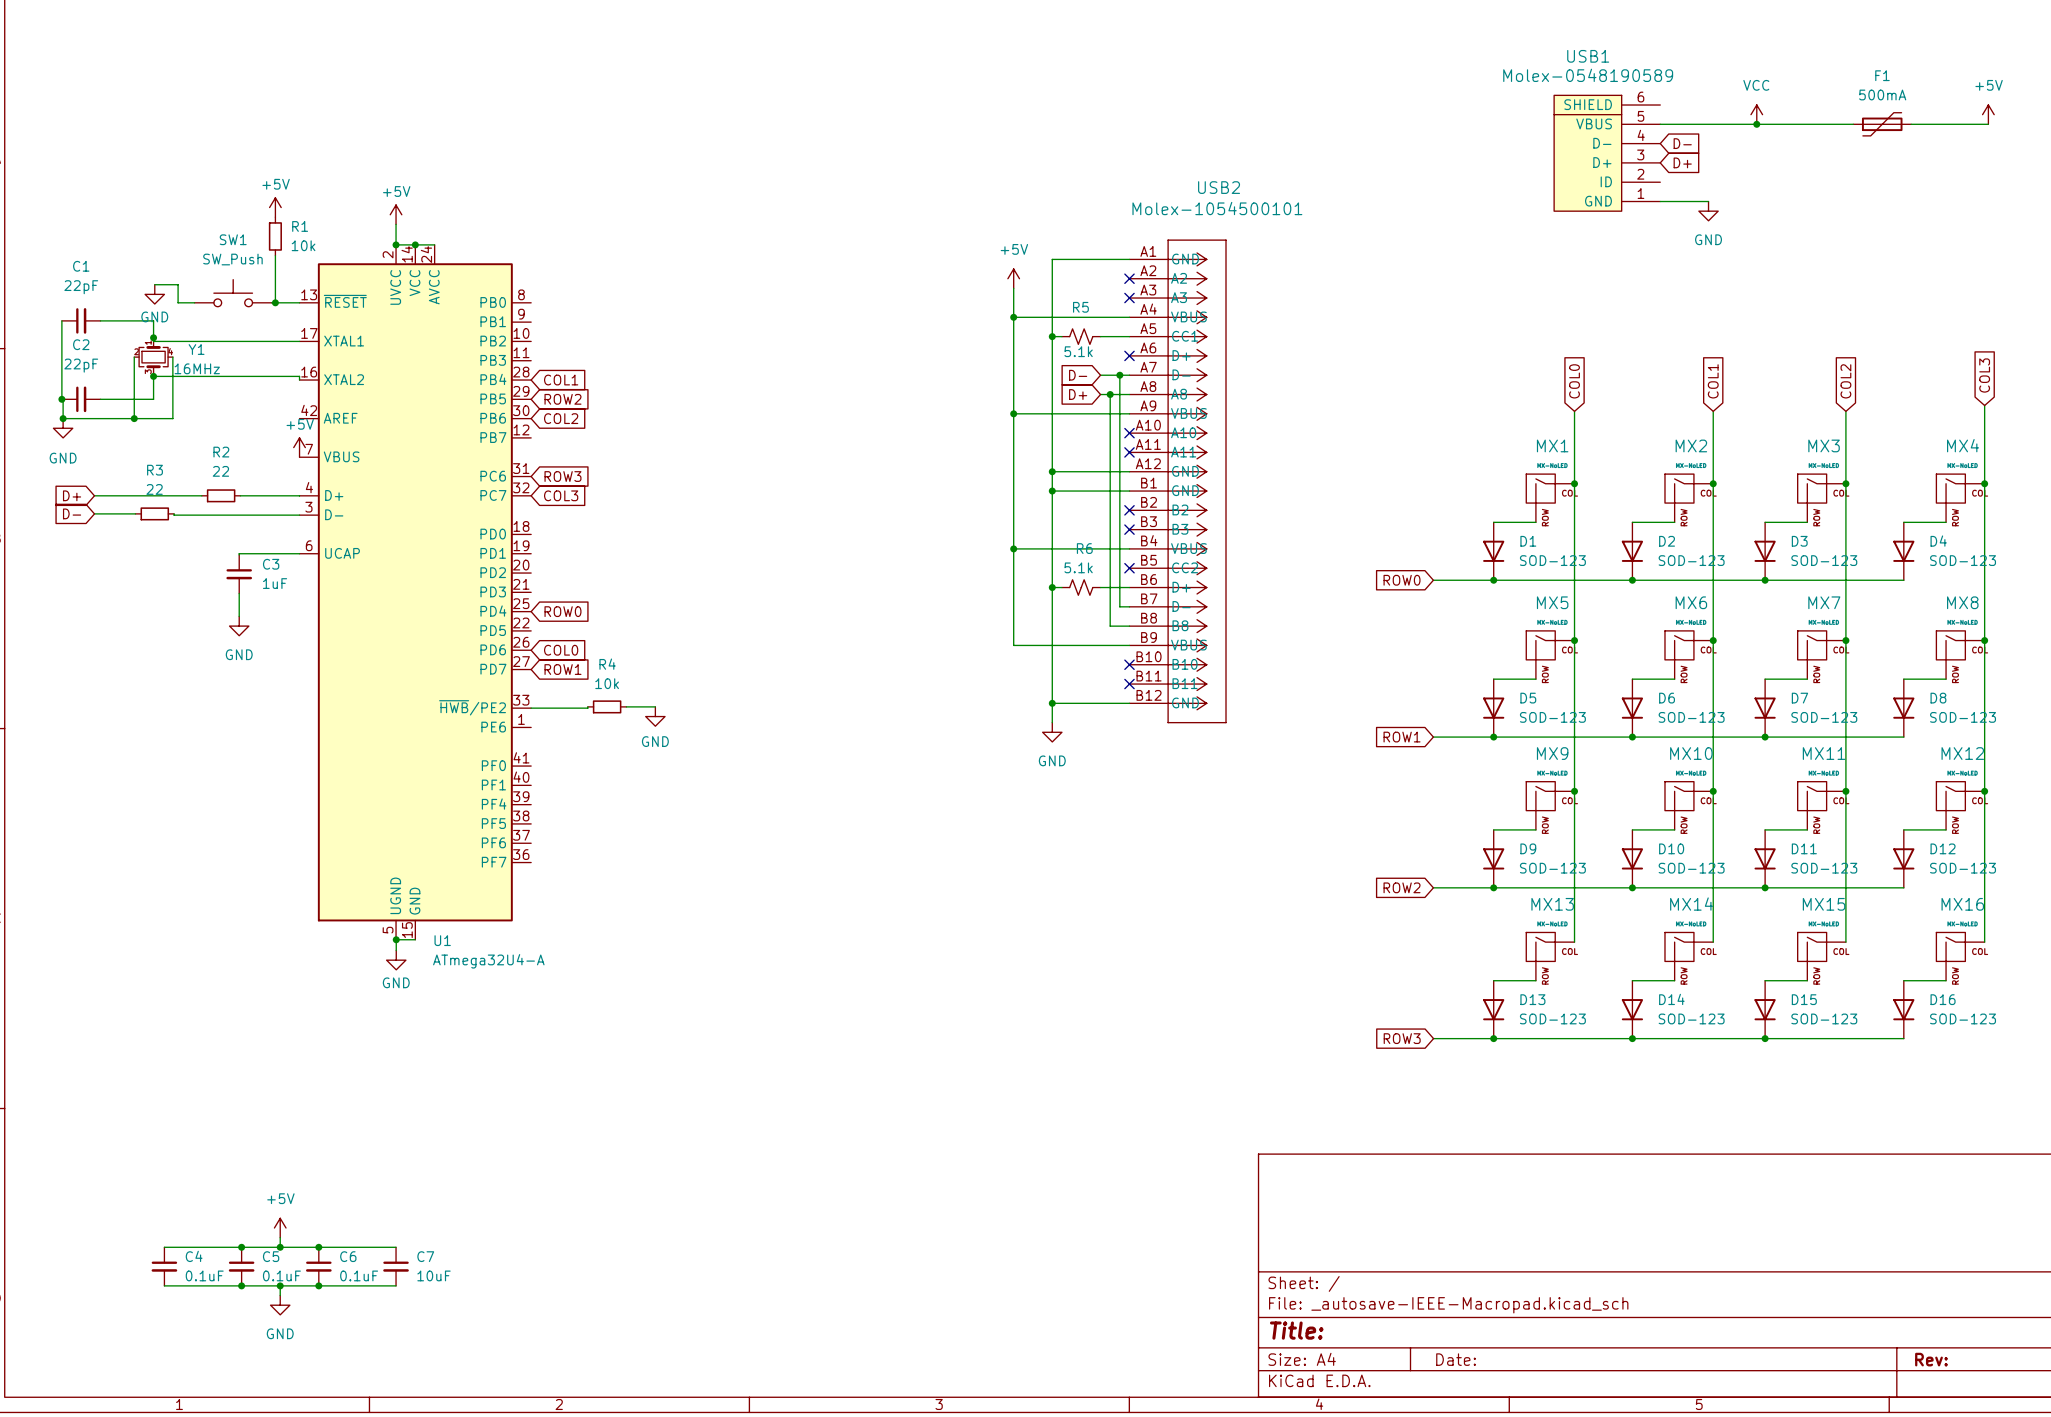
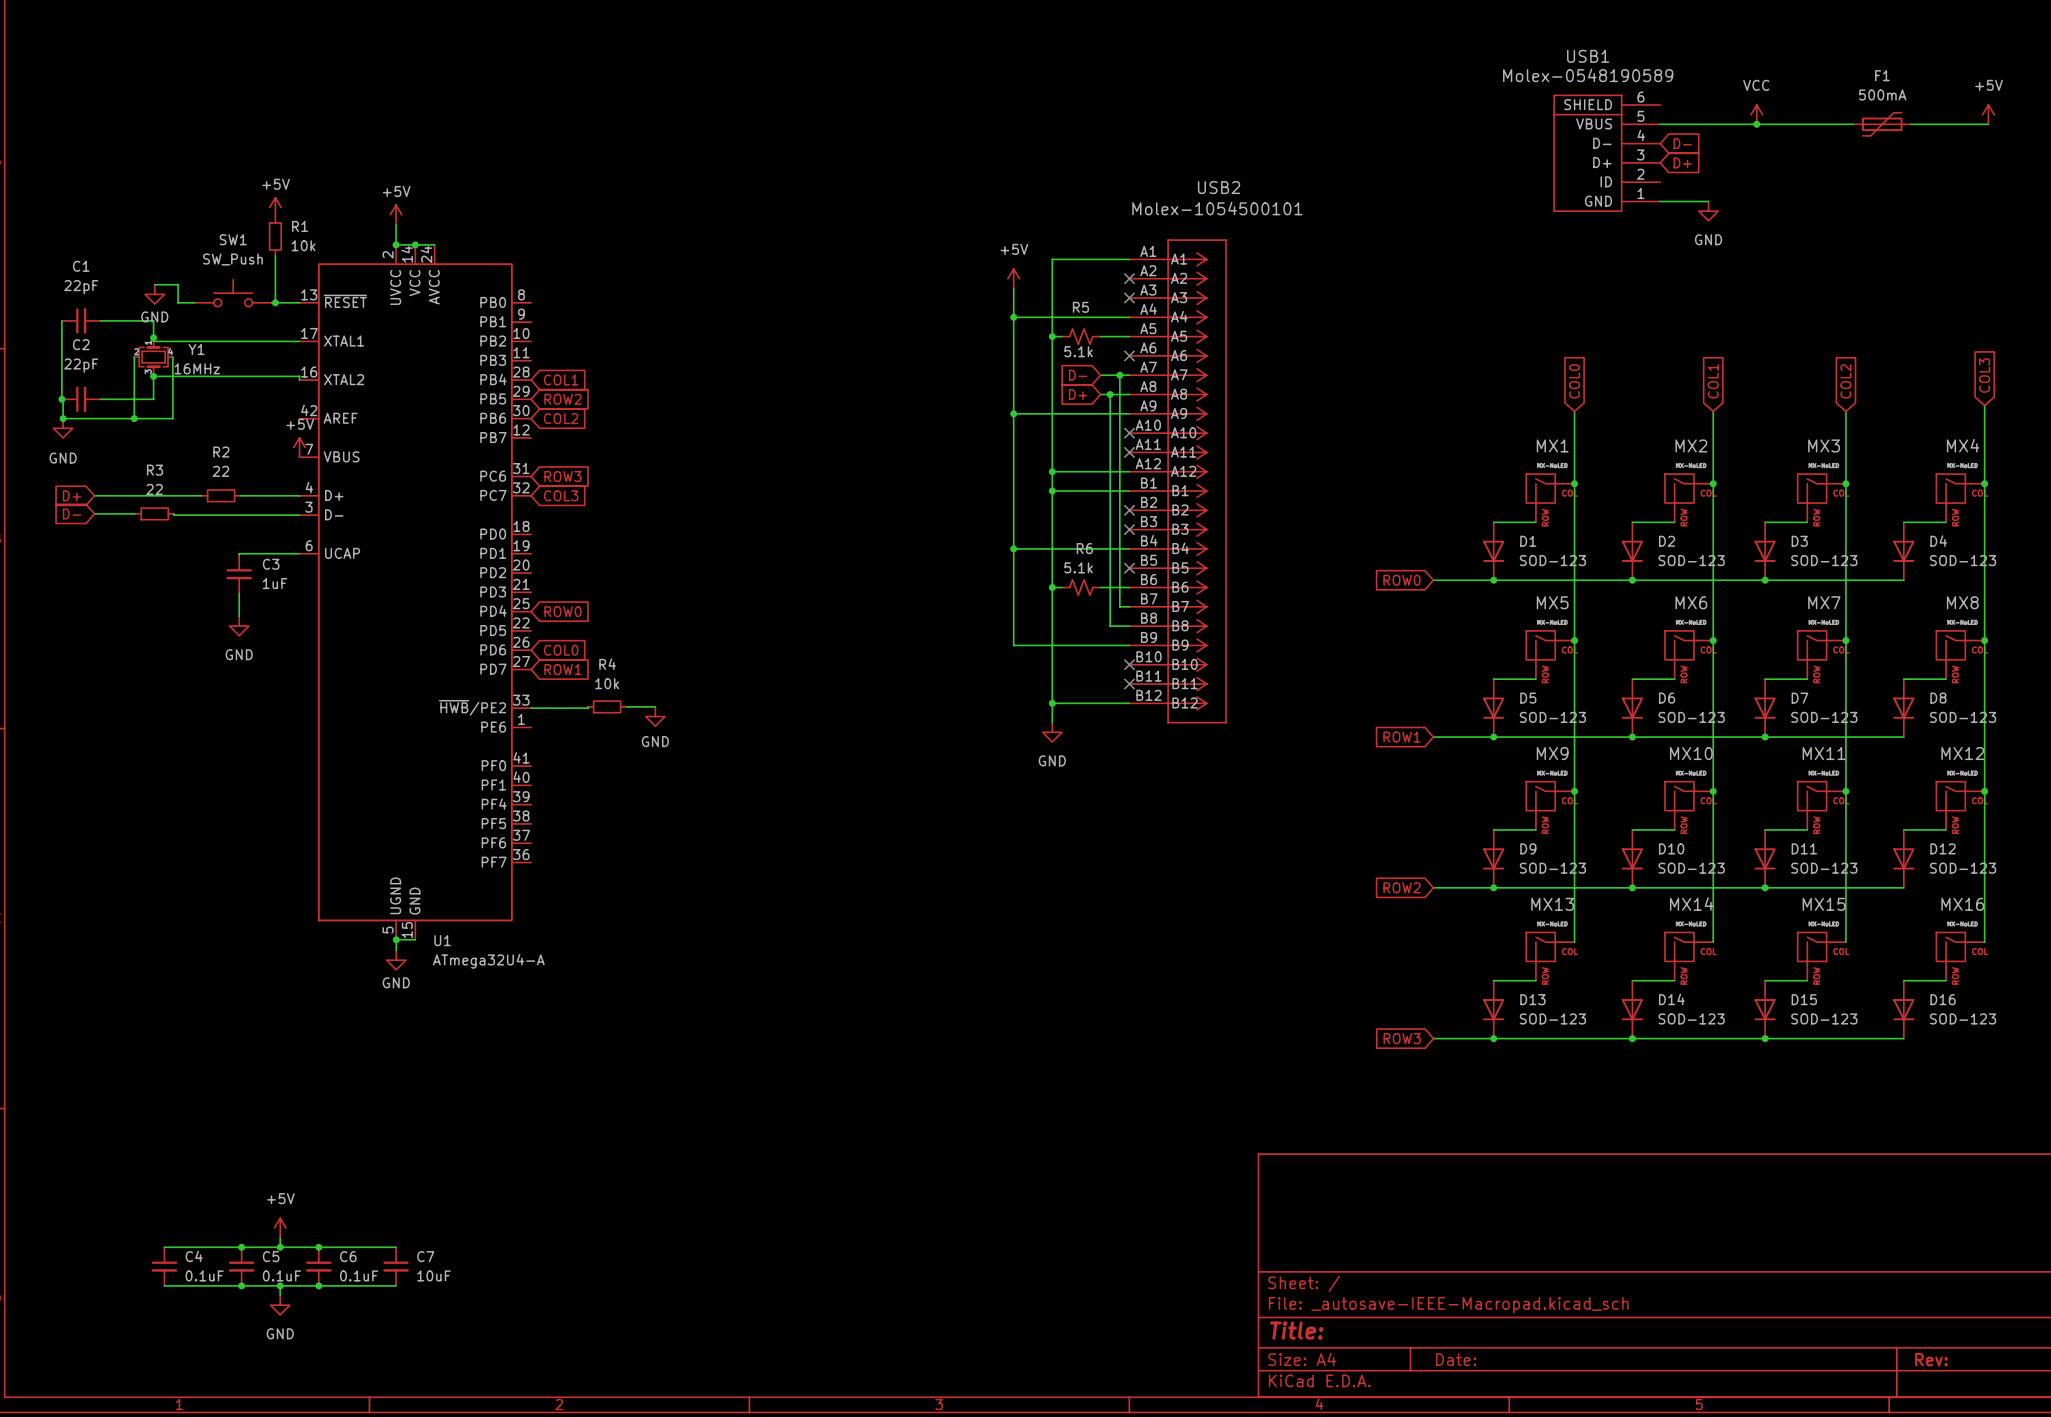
USB2 symbol: [1129, 239, 1227, 724] -> [1129, 239, 1227, 724]

